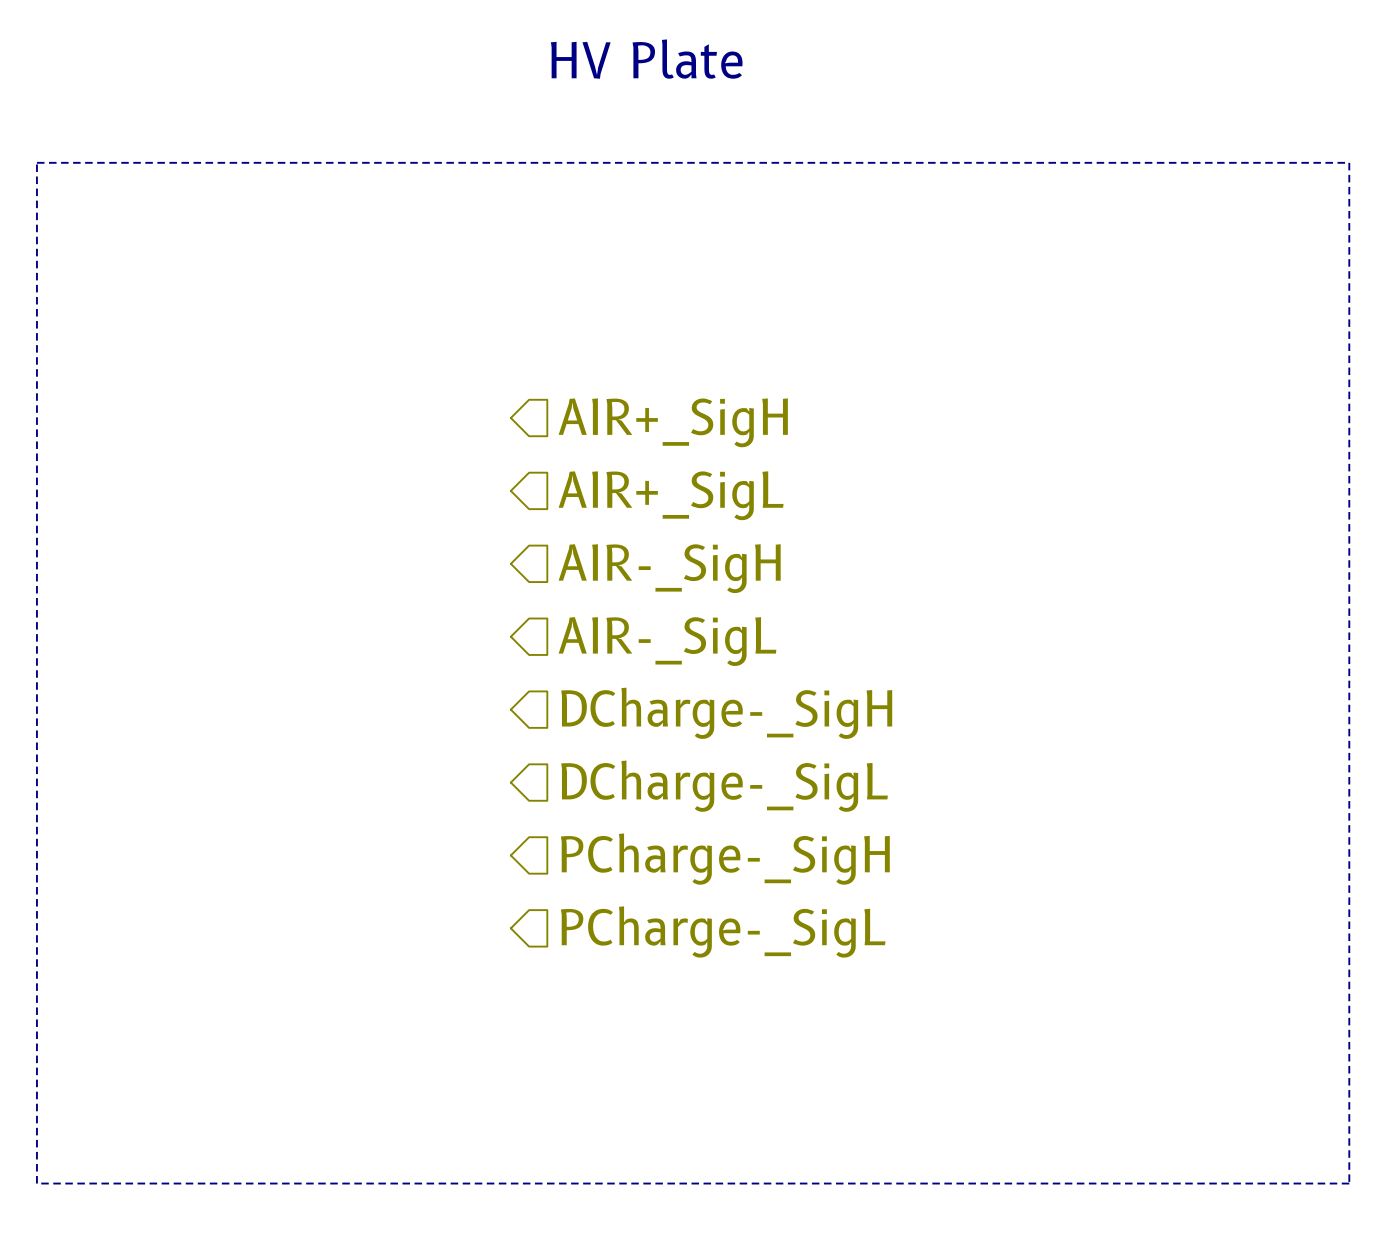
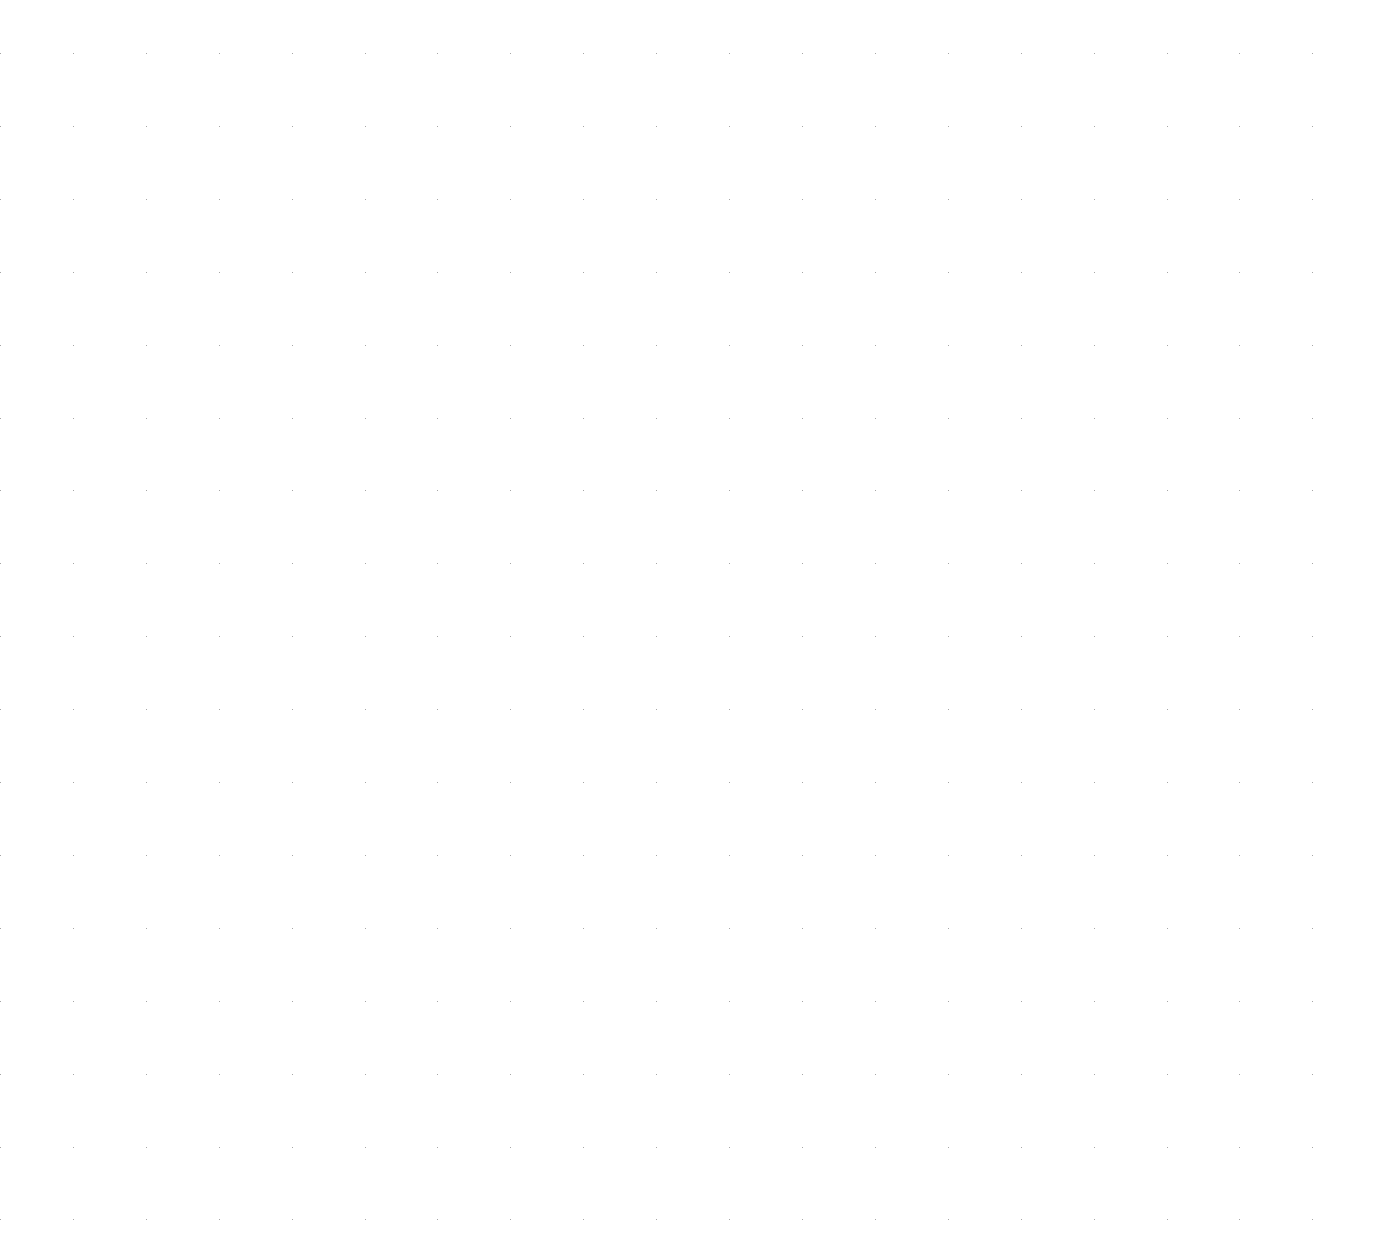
text: HV Plate (646, 59) -> none
line: (36, 162) (1349, 162) (1349, 1183) (36, 1183) (36, 162) -> none
hierarchical label: AIR+_SigH (673, 422) -> none
hierarchical label: AIR+_SigL (671, 495) -> none
hierarchical label: AIR-_SigH (669, 568) -> none
hierarchical label: AIR-_SigL (667, 641) -> none
hierarchical label: DCharge-_SigH (726, 713) -> none
hierarchical label: DCharge-_SigL (724, 786) -> none
hierarchical label: PCharge-_SigH (725, 859) -> none
hierarchical label: PCharge-_SigL (723, 931) -> none

